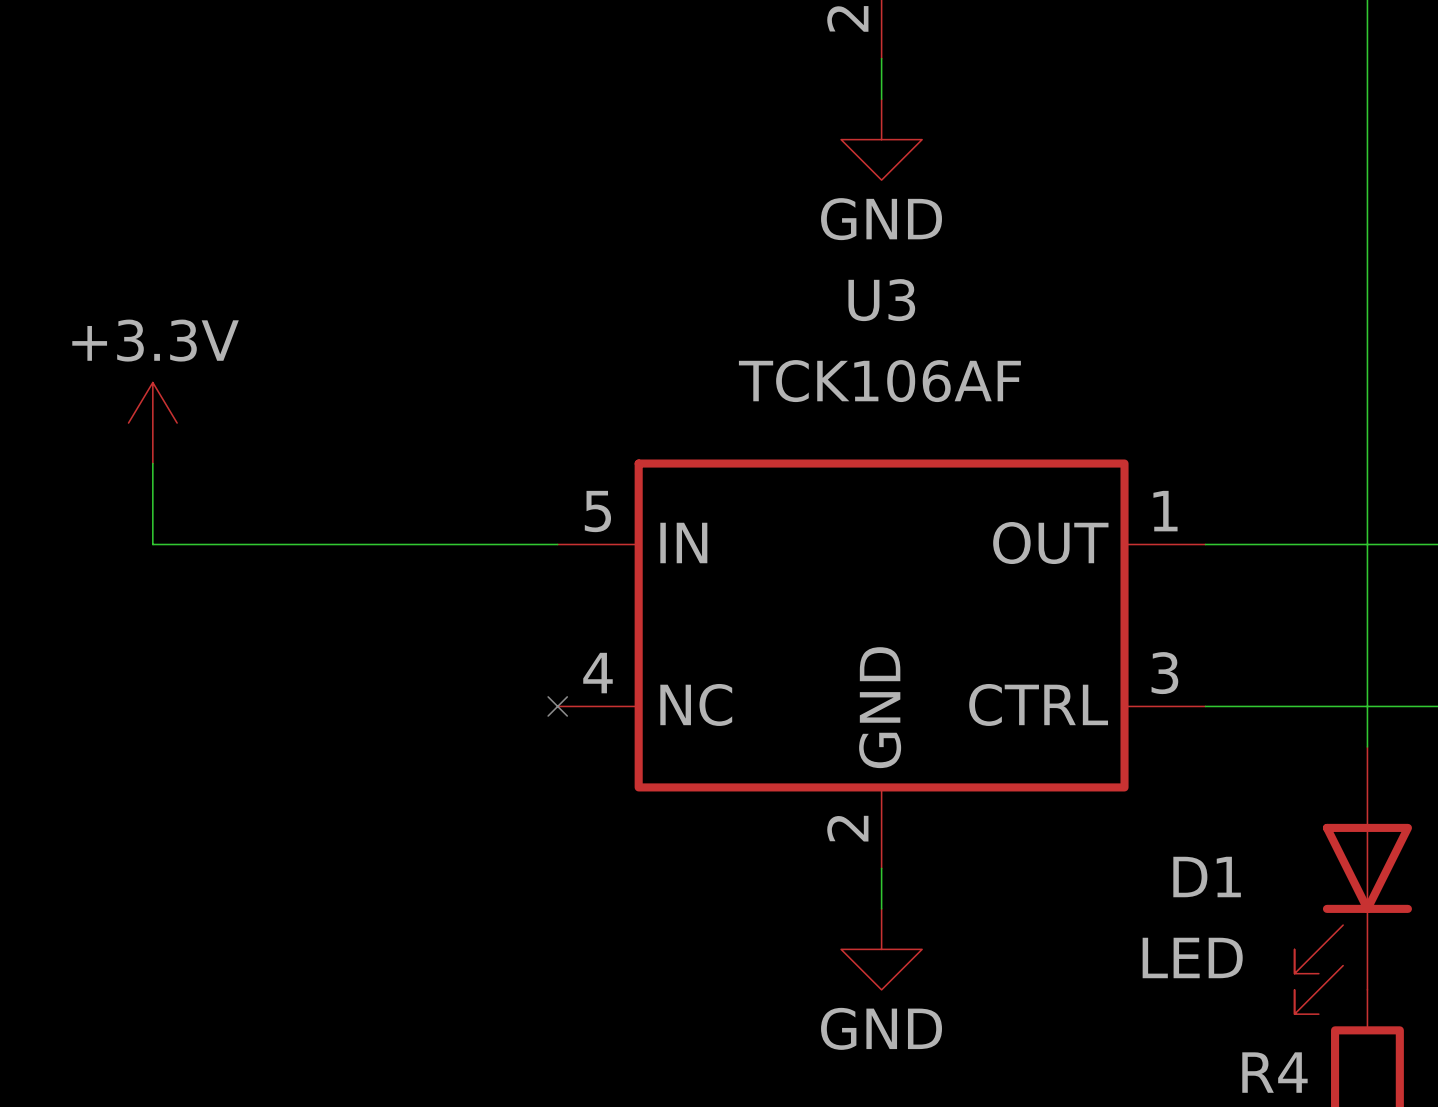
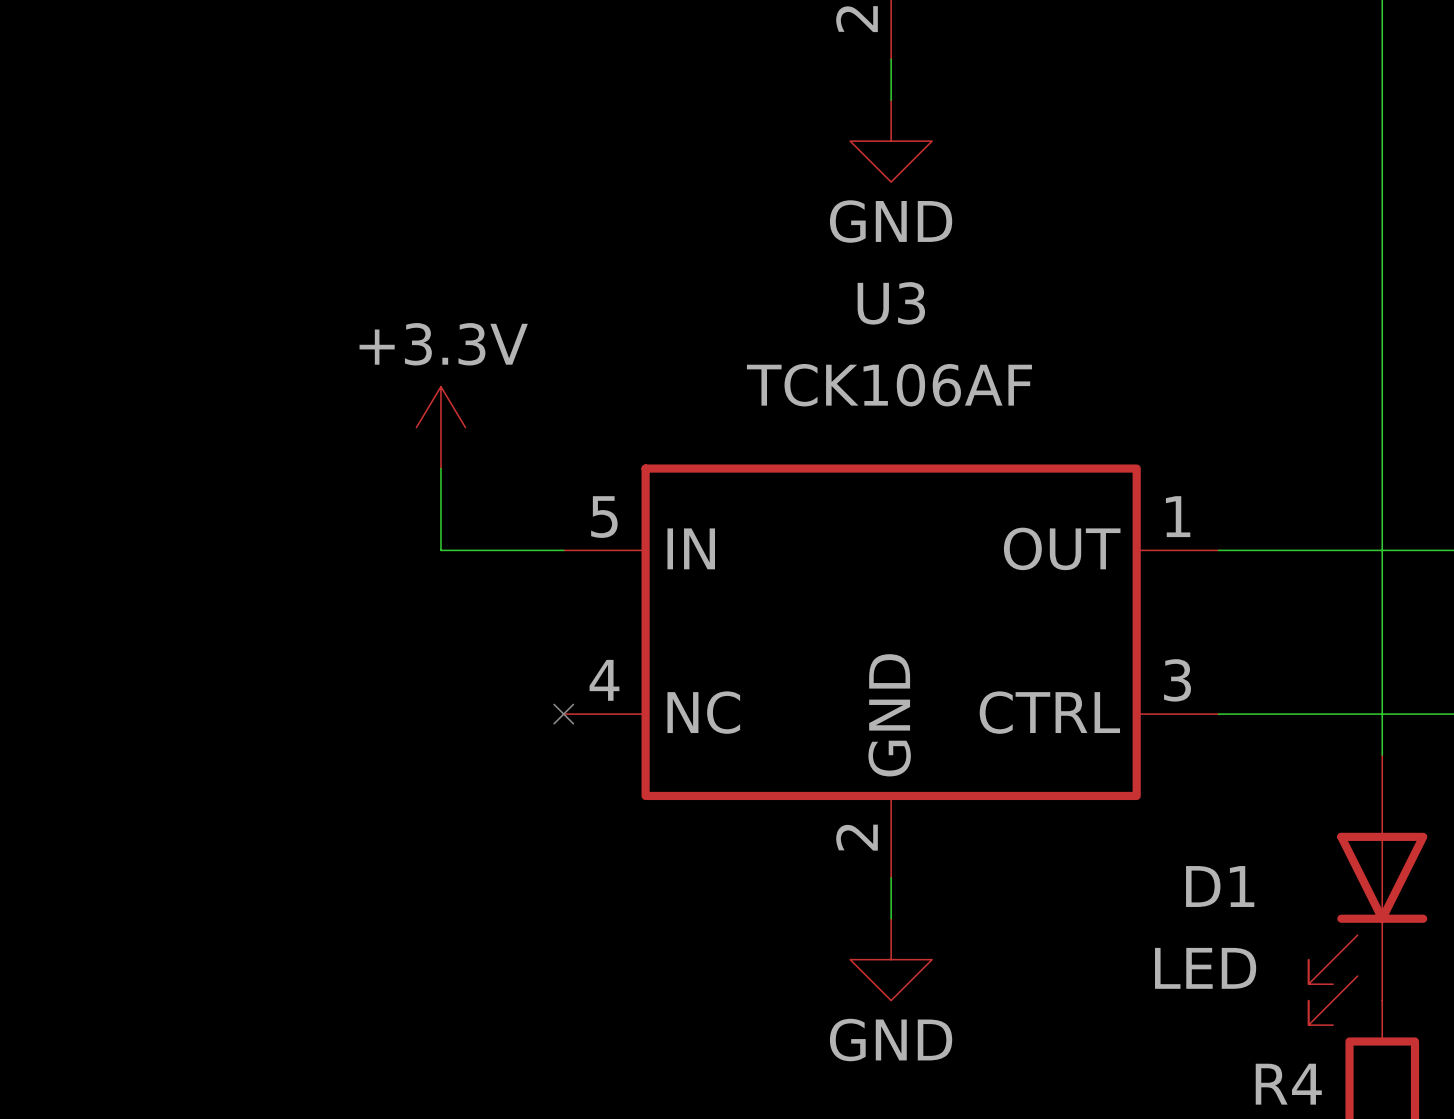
power symbol position: +3.3V (152, 423) -> +3.3V (440, 427)
wire: (152, 463) (152, 544) (436, 544) -> (440, 468) (440, 550)

